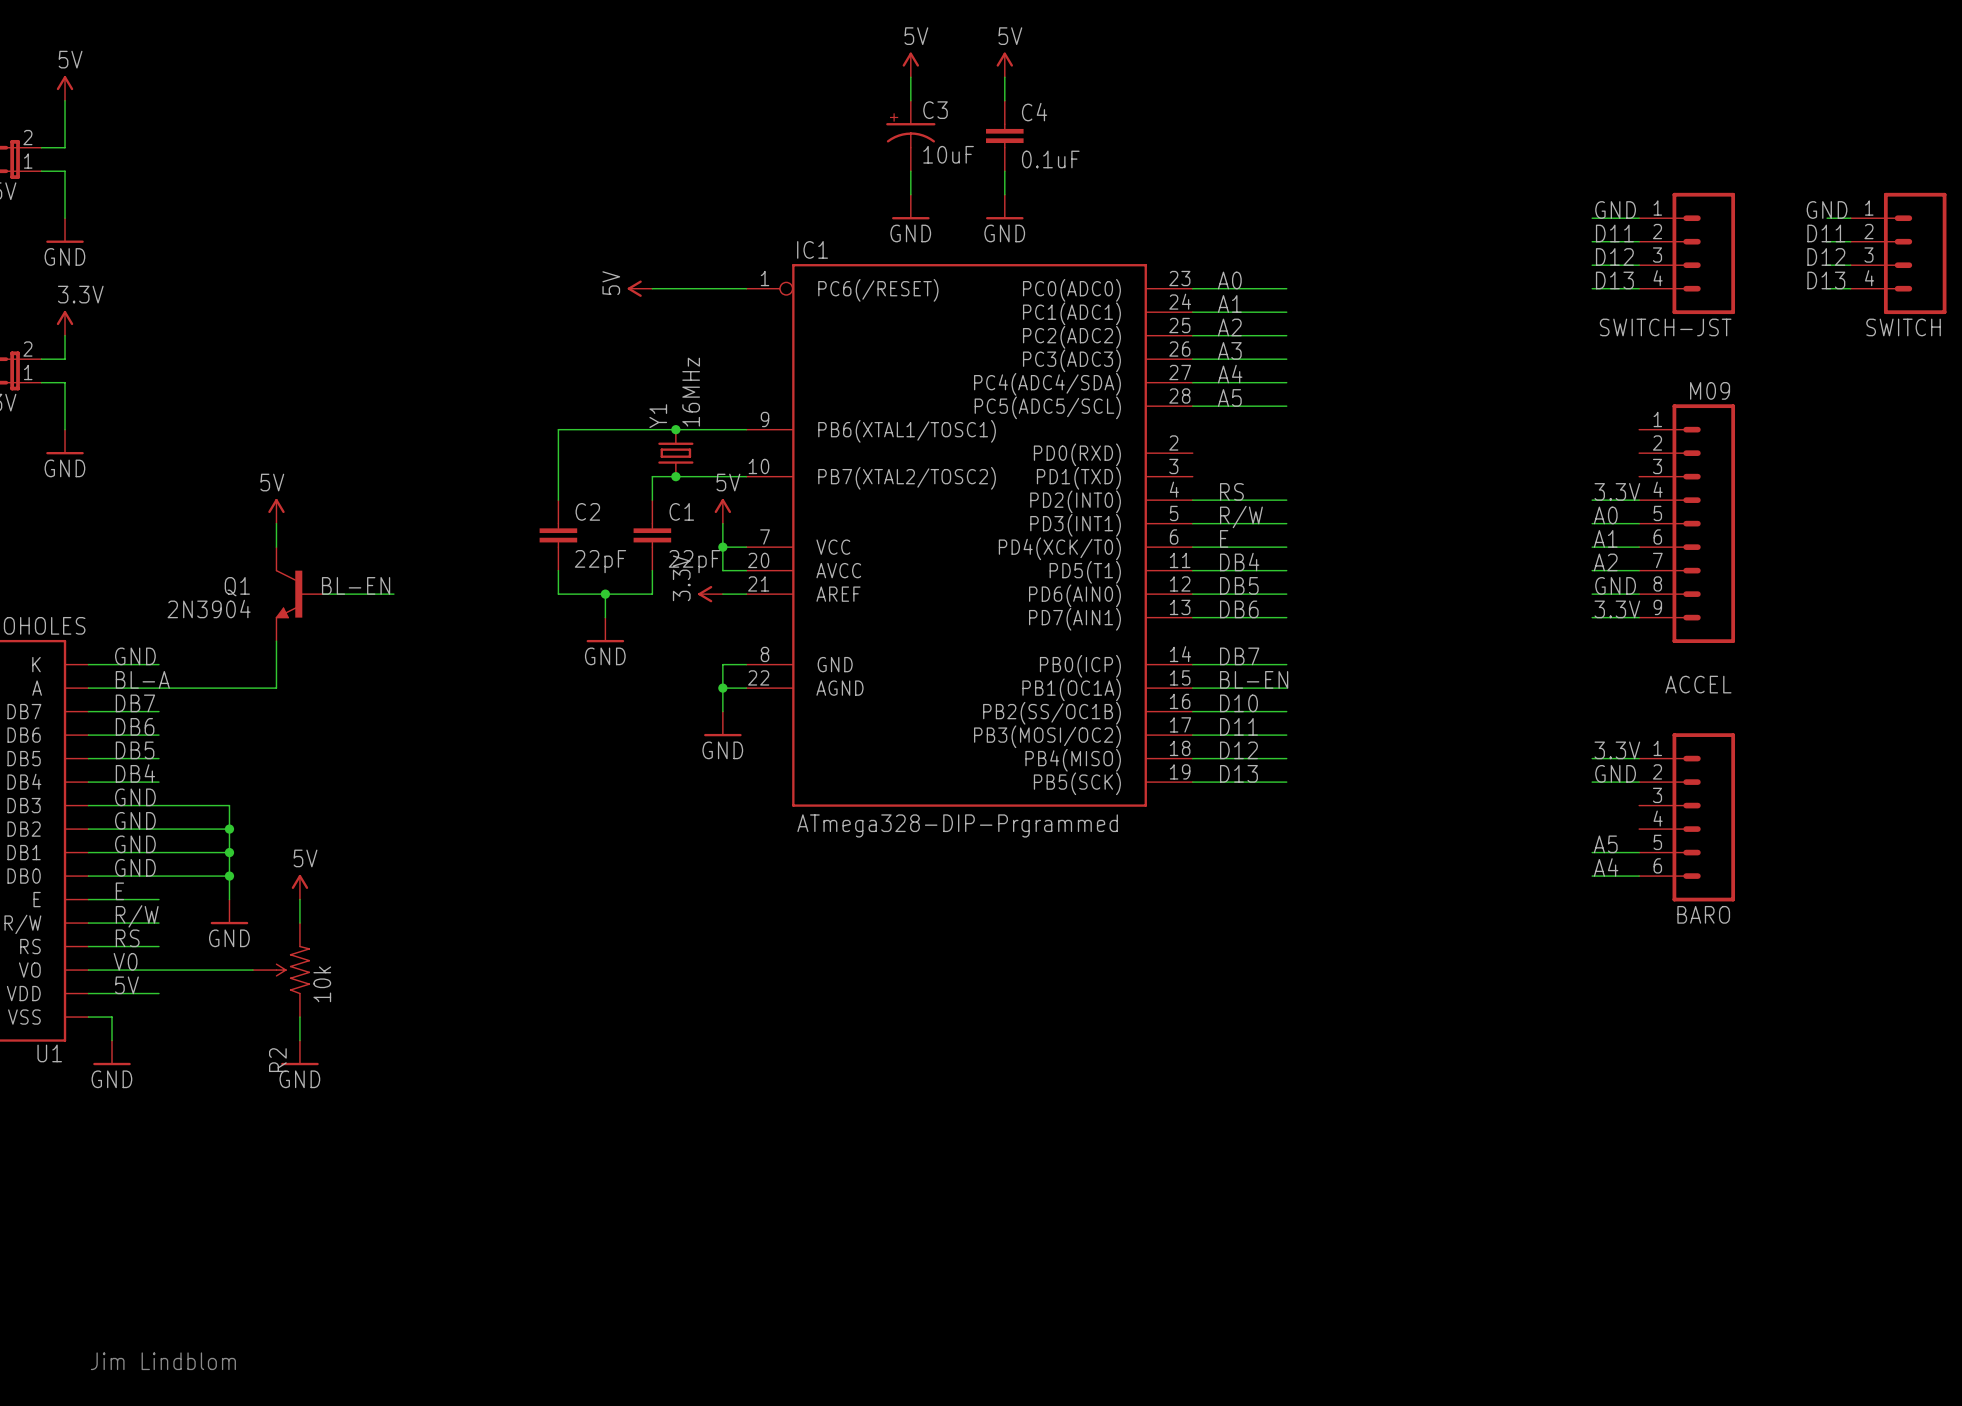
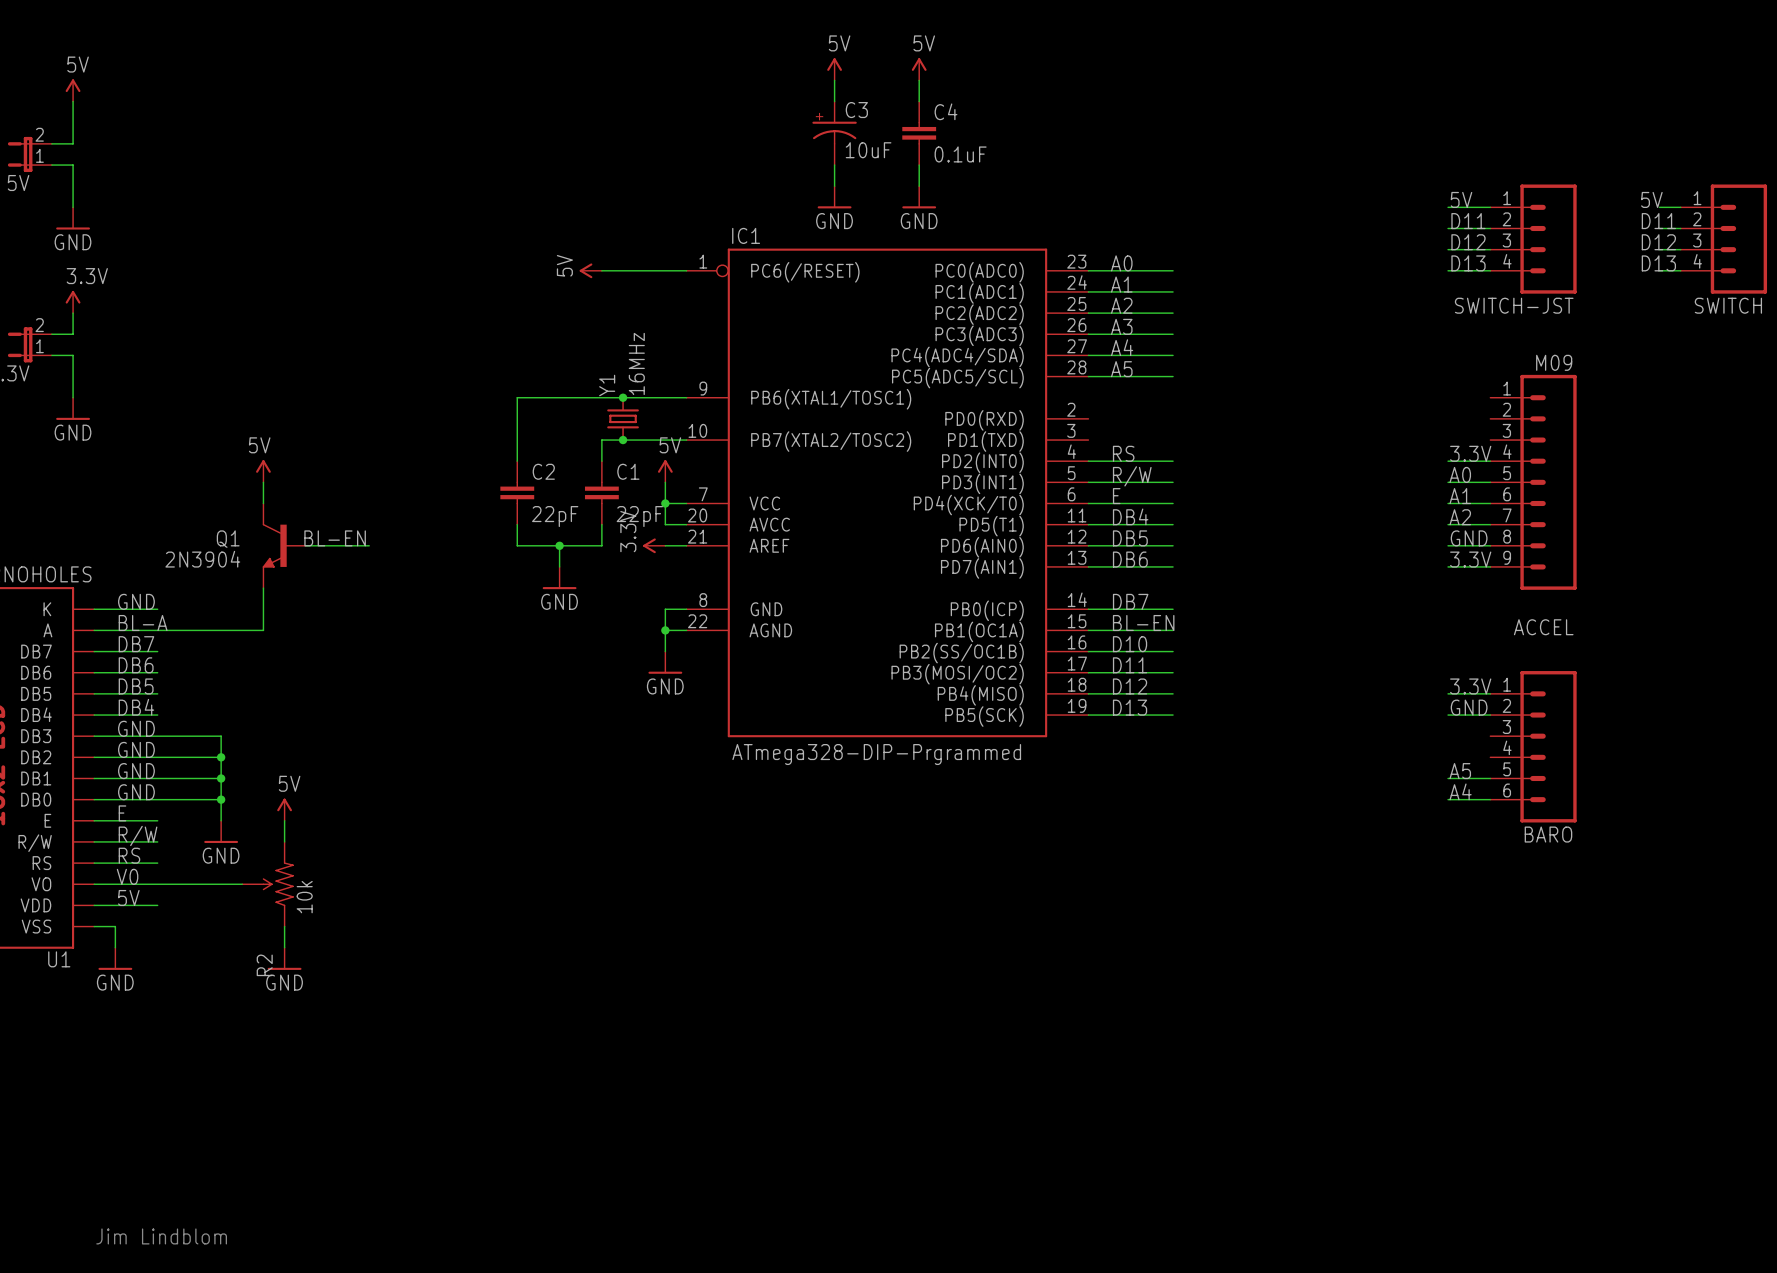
label: GND (1615, 209) -> 5V (1461, 199)
label: GND (1827, 209) -> 5V (1651, 199)

